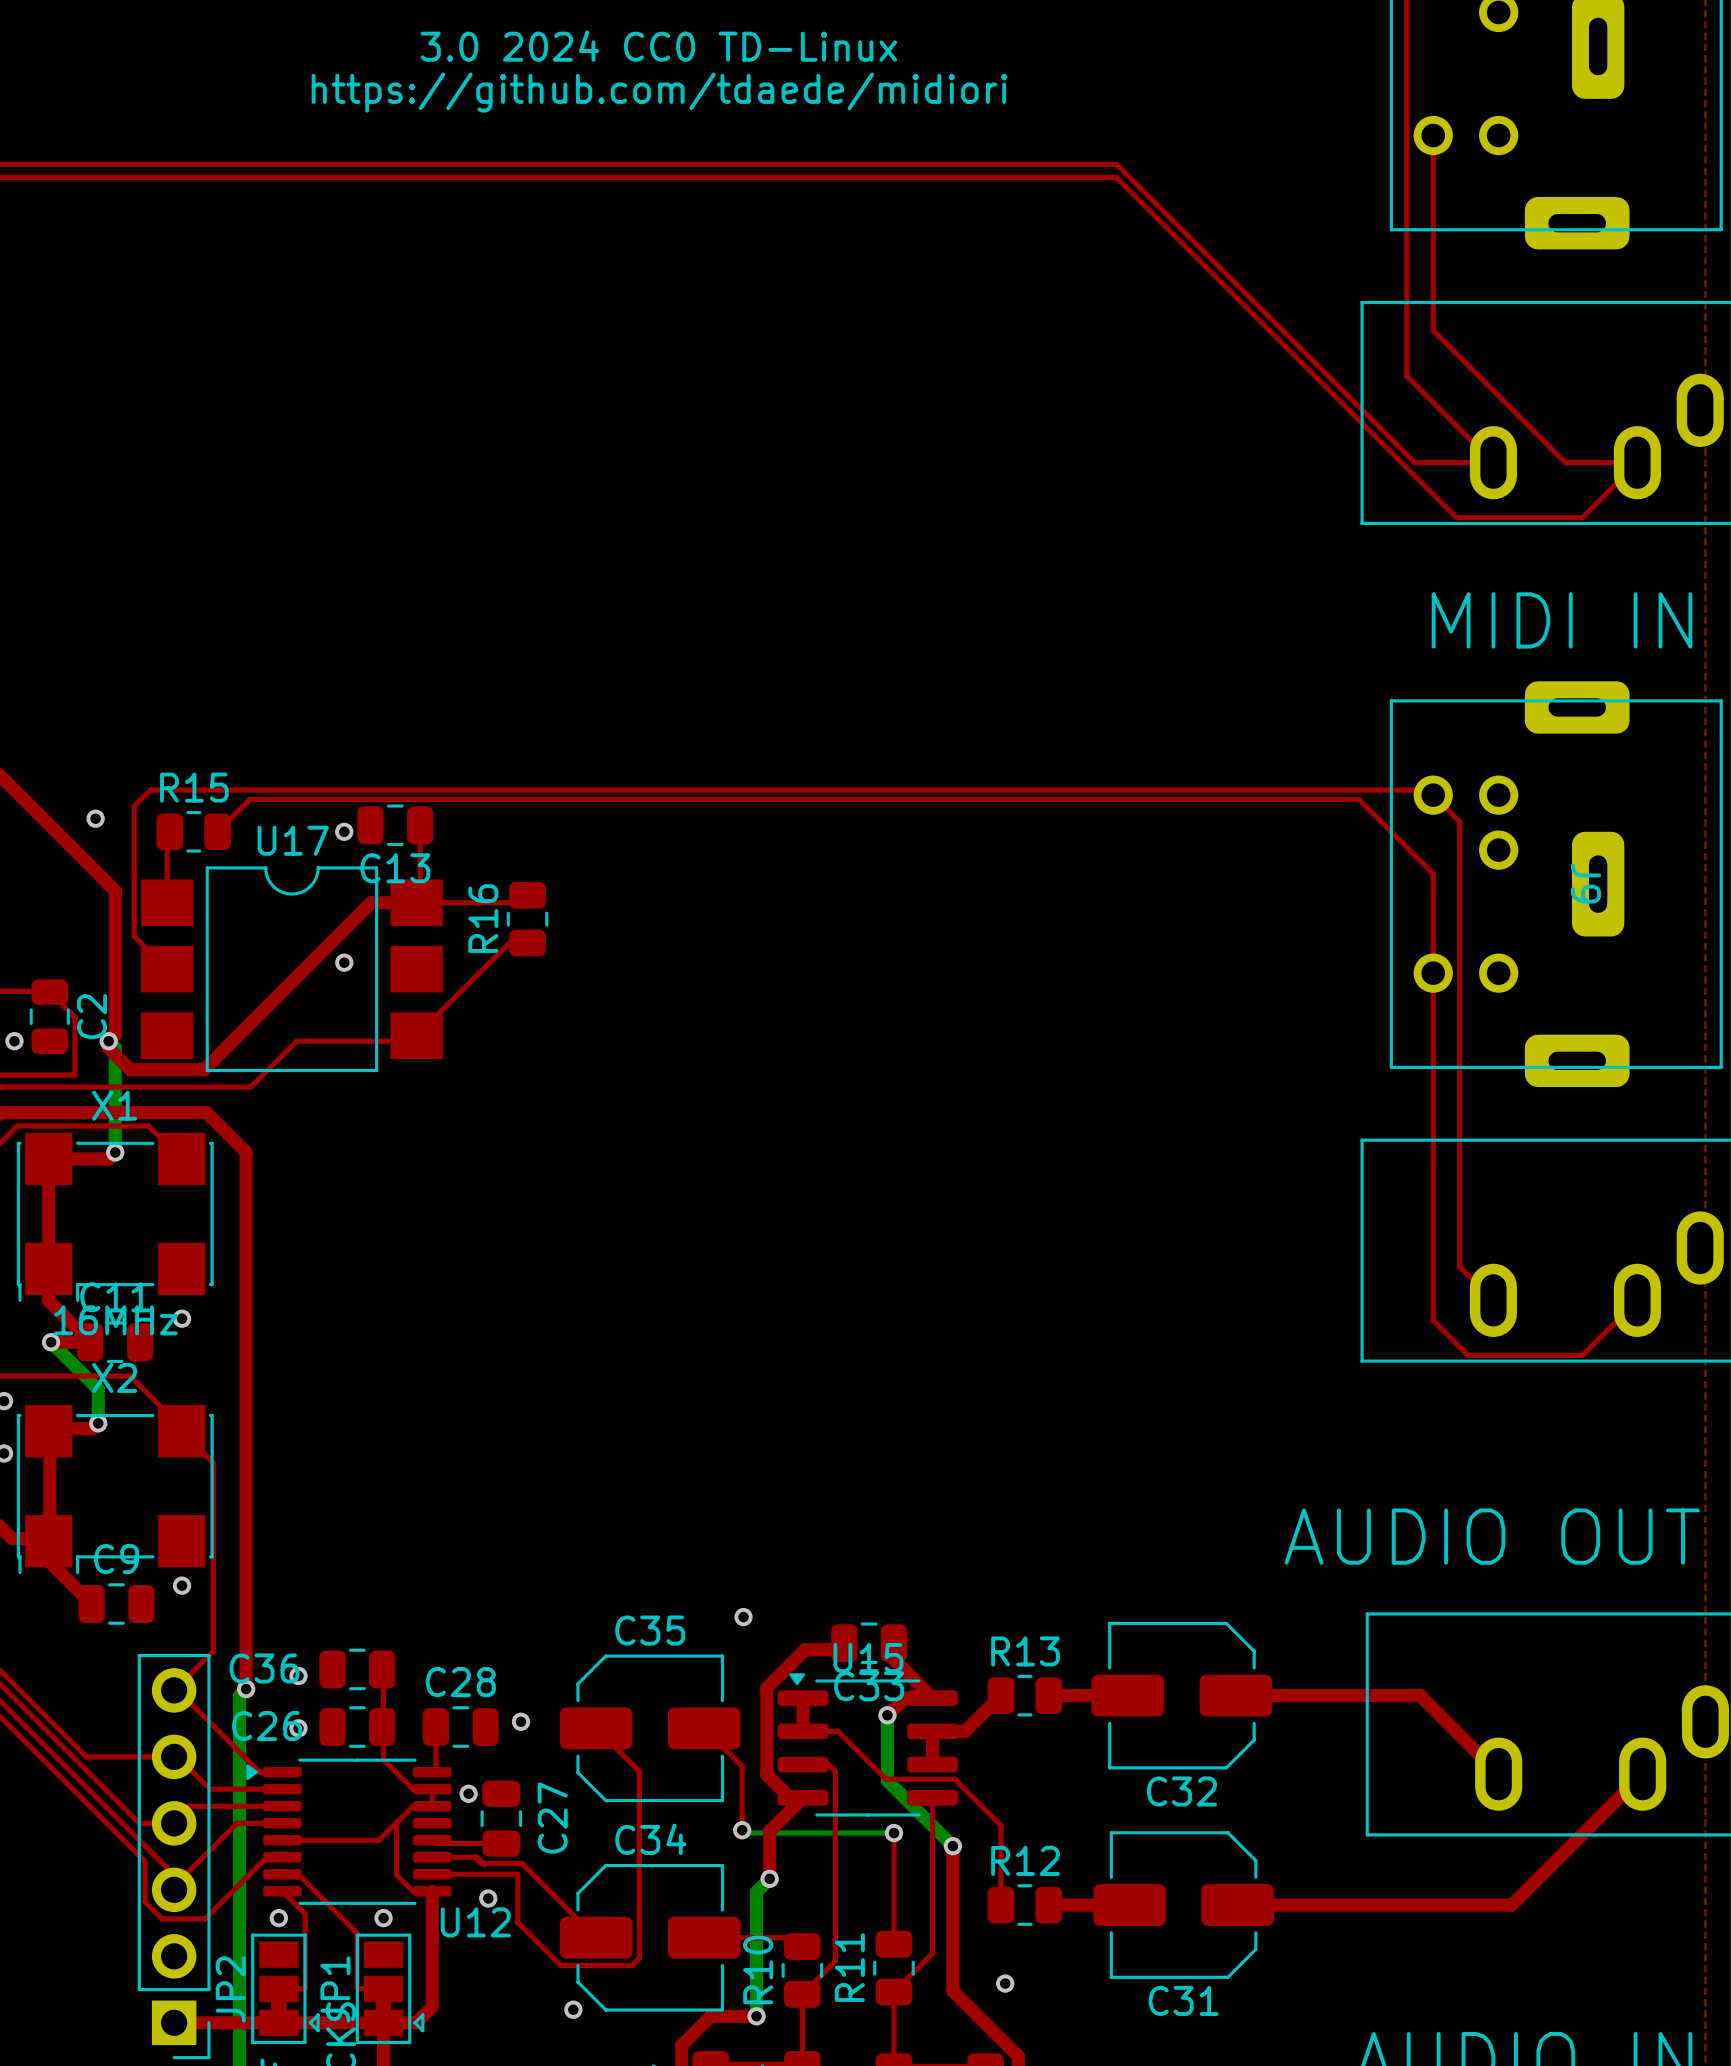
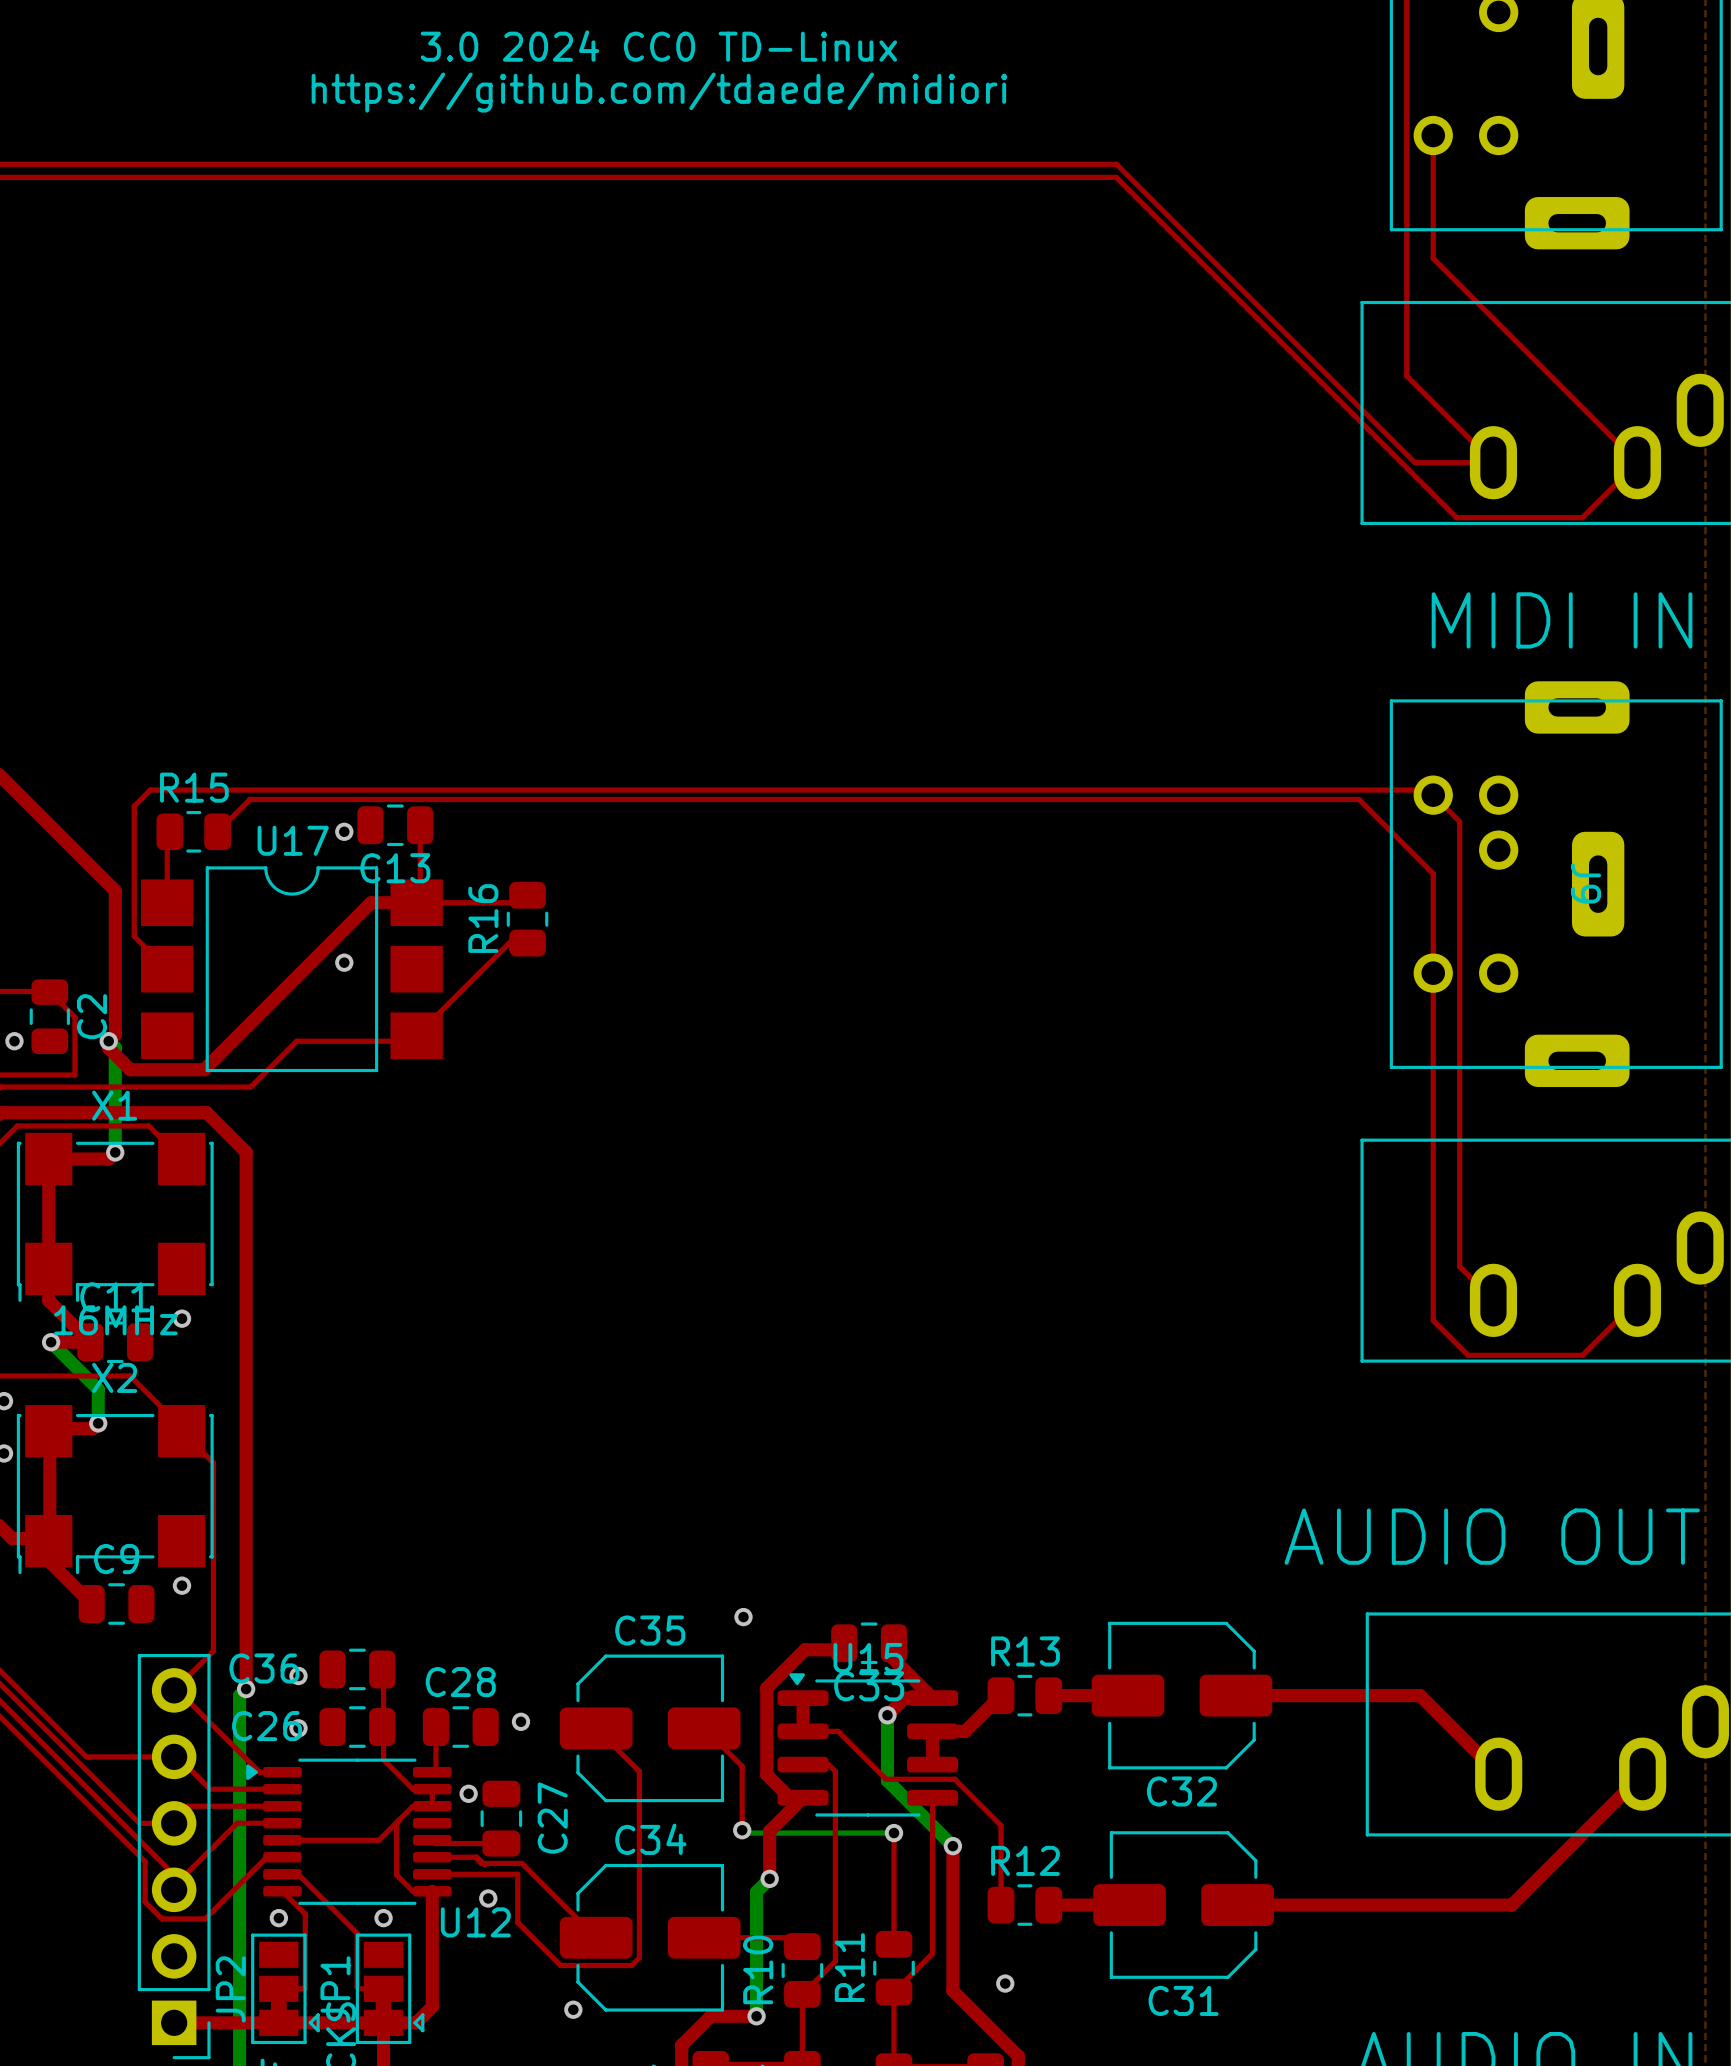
top track: (1433, 258) (1433, 330) (1565, 462) (1637, 462) -> (1433, 258) (1637, 462)
via: (95, 818) -> none

